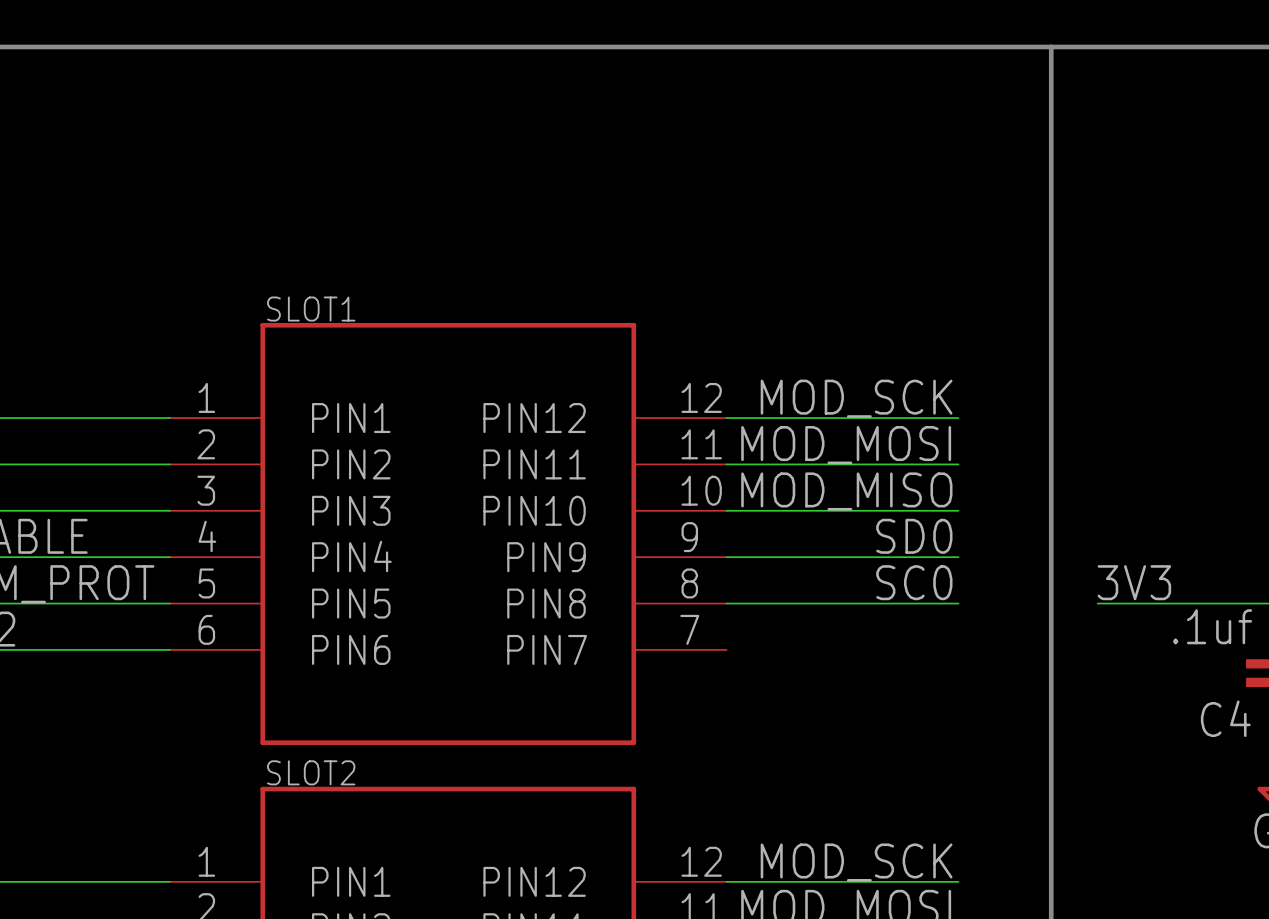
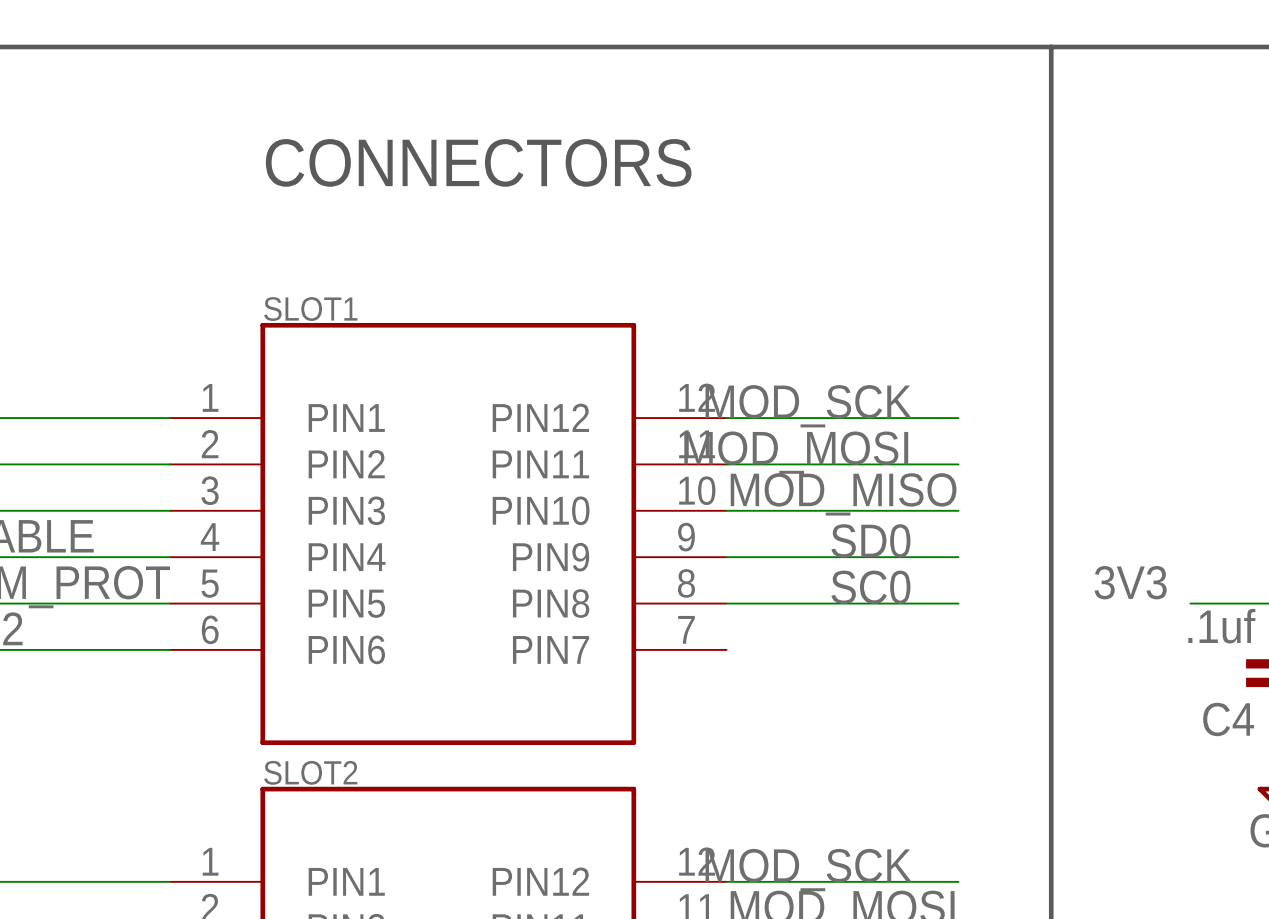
text: none -> CONNECTORS (478, 162)
label position: MOD_SCK (856, 398) -> MOD_SCK (808, 406)
label position: MOD_MOSI (846, 445) -> MOD_MOSI (796, 452)
label position: SD0 (914, 536) -> SD0 (870, 540)
label position: SC0 (914, 582) -> SC0 (870, 587)
wire: (1097, 603) (1190, 603) -> none
label position: MOD_SCK (856, 862) -> MOD_SCK (808, 870)

